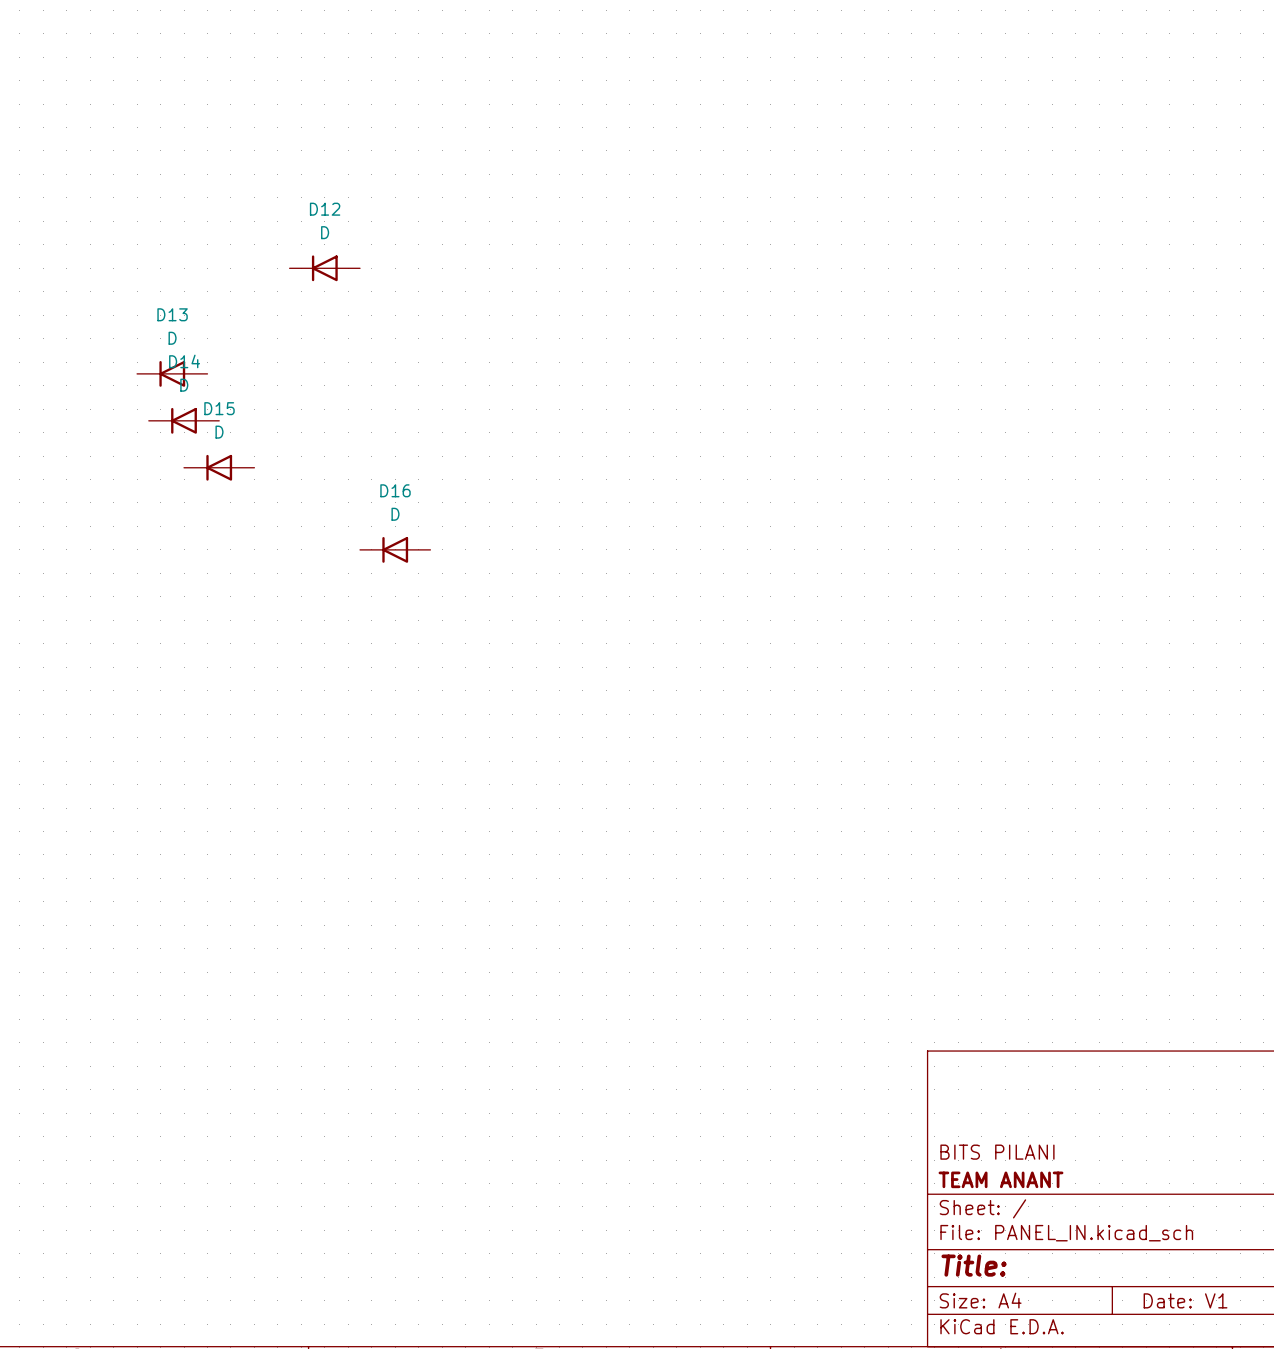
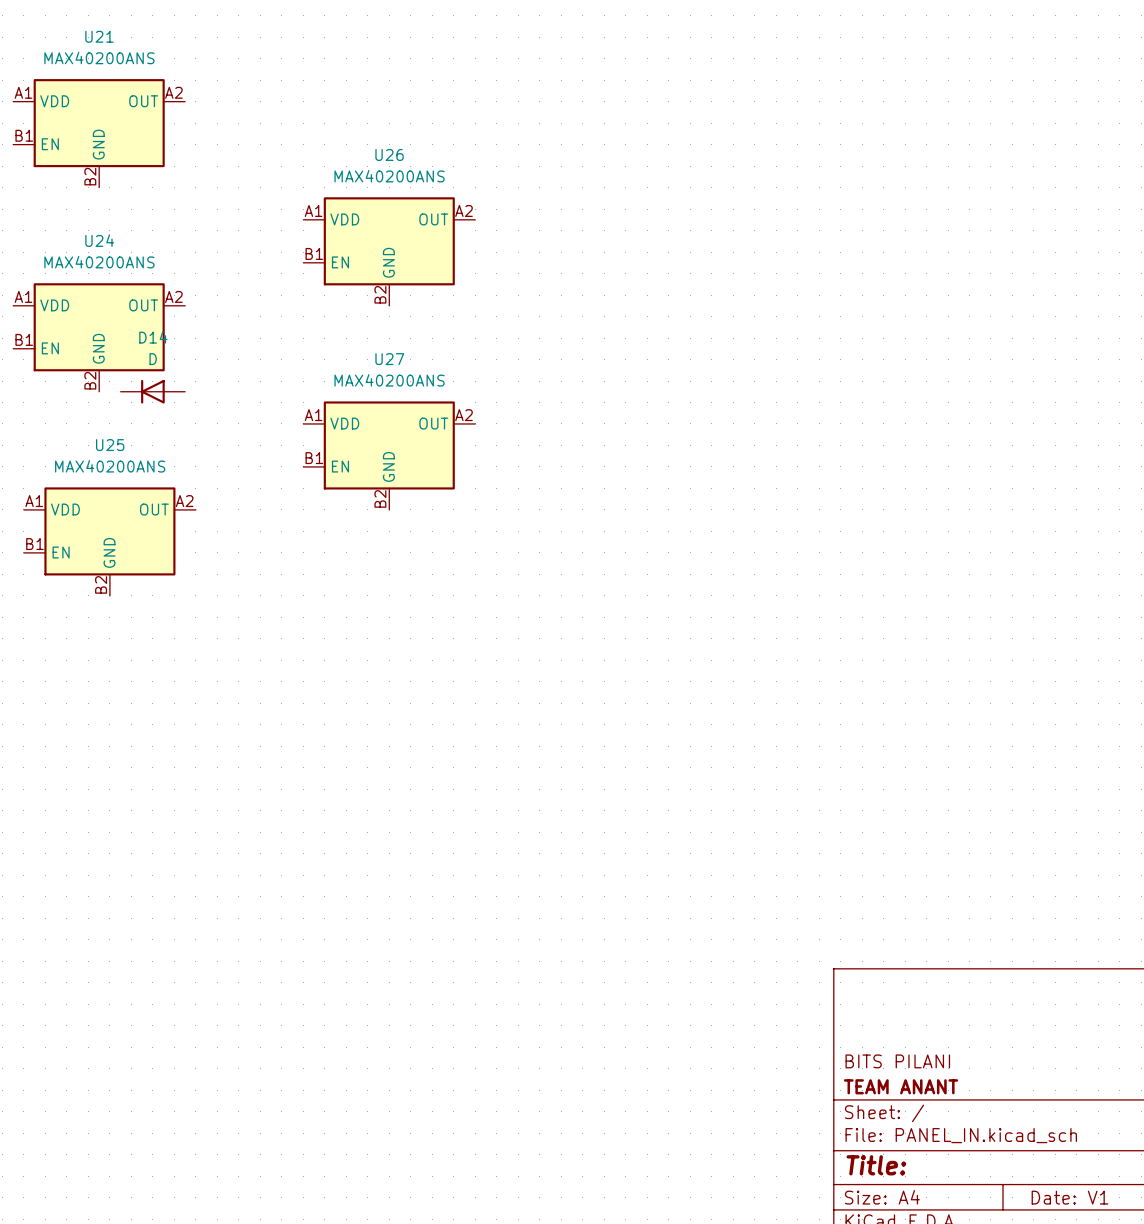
U21: none -> MAX40200ANS (99, 133)
U26: none -> MAX40200ANS (389, 251)
D12: D (324, 268) -> none
U24: none -> MAX40200ANS (99, 337)
D13: D (172, 373) -> none
D15: D (219, 467) -> none
U27: none -> MAX40200ANS (389, 455)
D16: D (395, 549) -> none
U25: none -> MAX40200ANS (109, 541)

